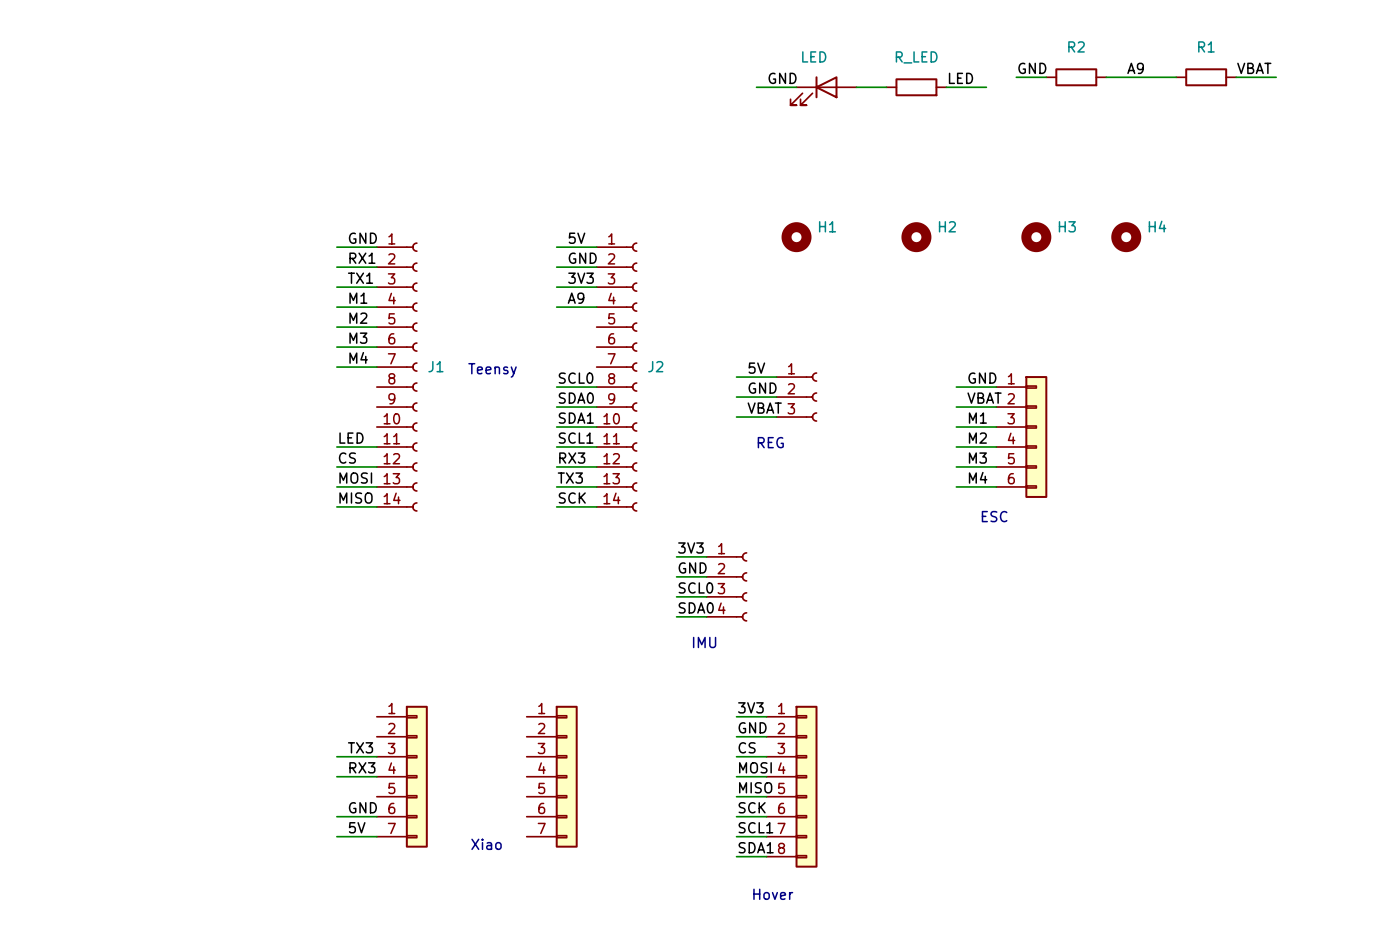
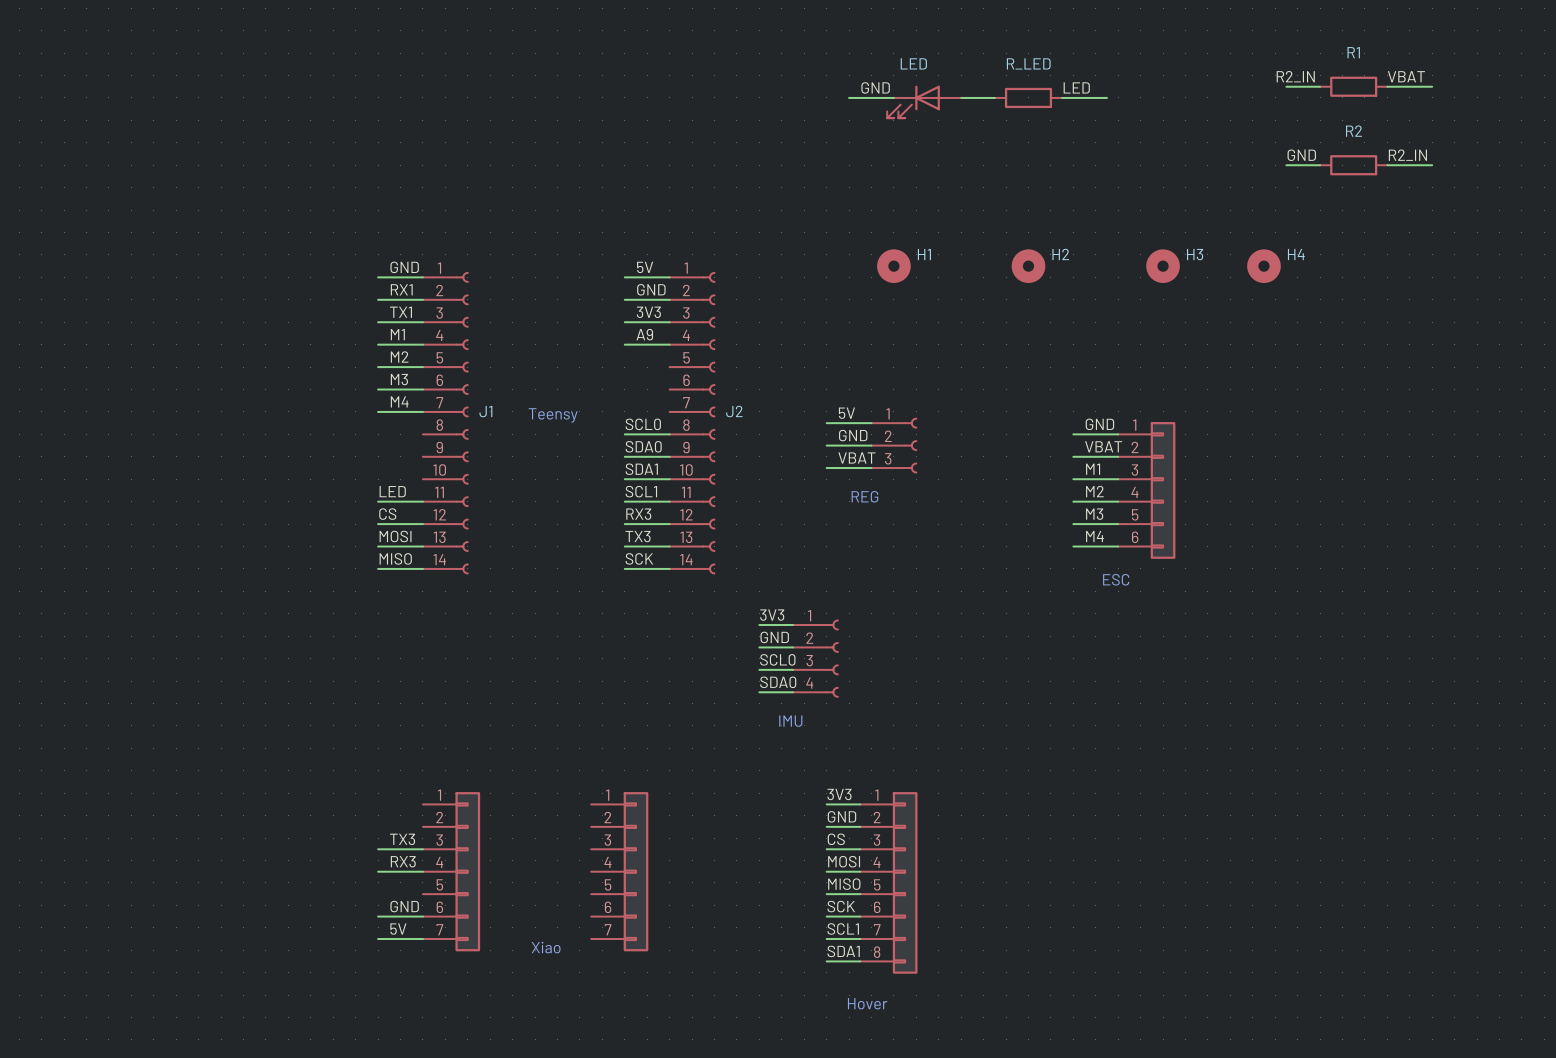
label position: GND (1032, 68) -> GND (1301, 155)
label: A9 (1135, 68) -> none
label: none -> R2_IN (1295, 76)
wire: (1016, 77) (1046, 77) -> (1286, 165) (1320, 165)
part position: (1076, 77) -> (1353, 165)
wire: (1106, 77) (1146, 77) -> (1387, 165) (1432, 165)
label: none -> R2_IN (1407, 155)

